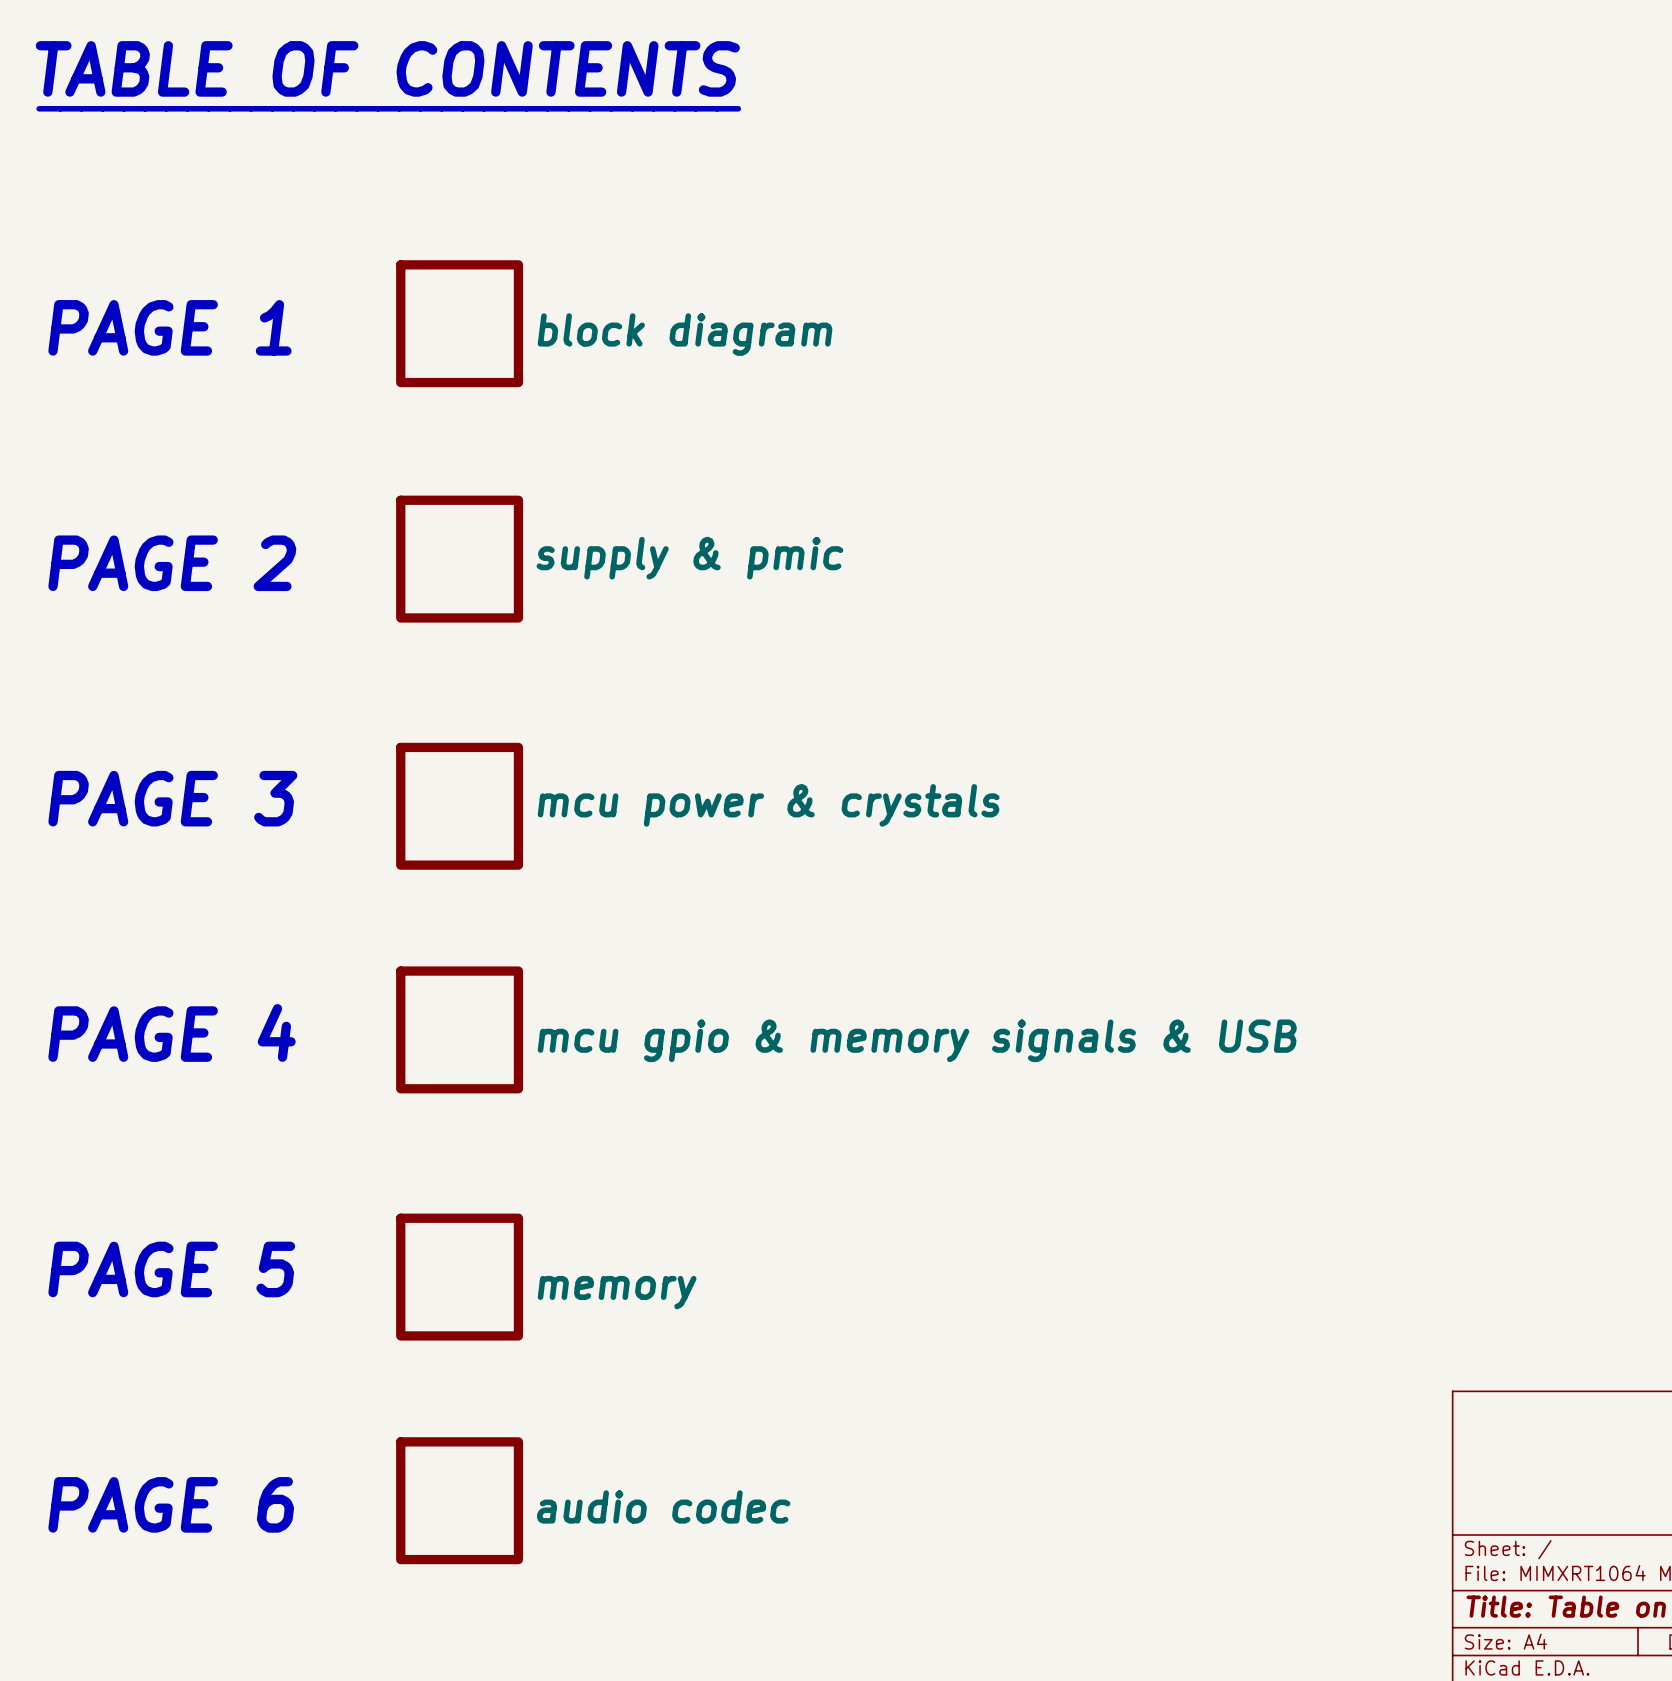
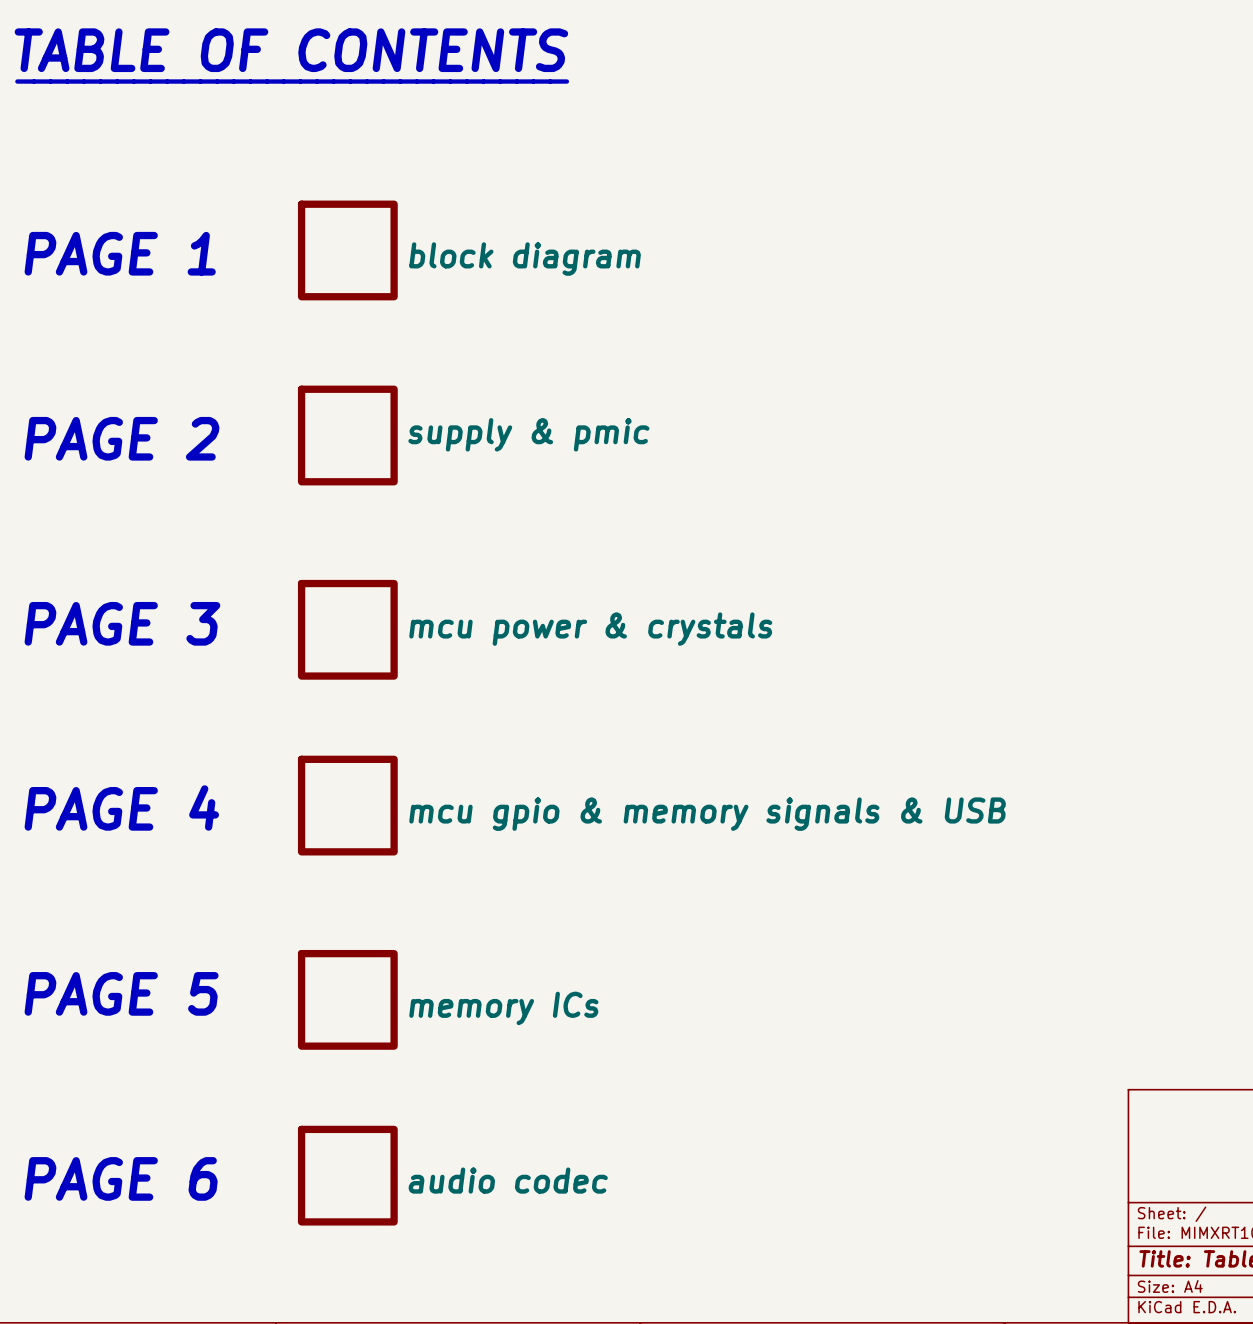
sheet memory name: memory (617, 1292) -> memory ICs (503, 1008)

